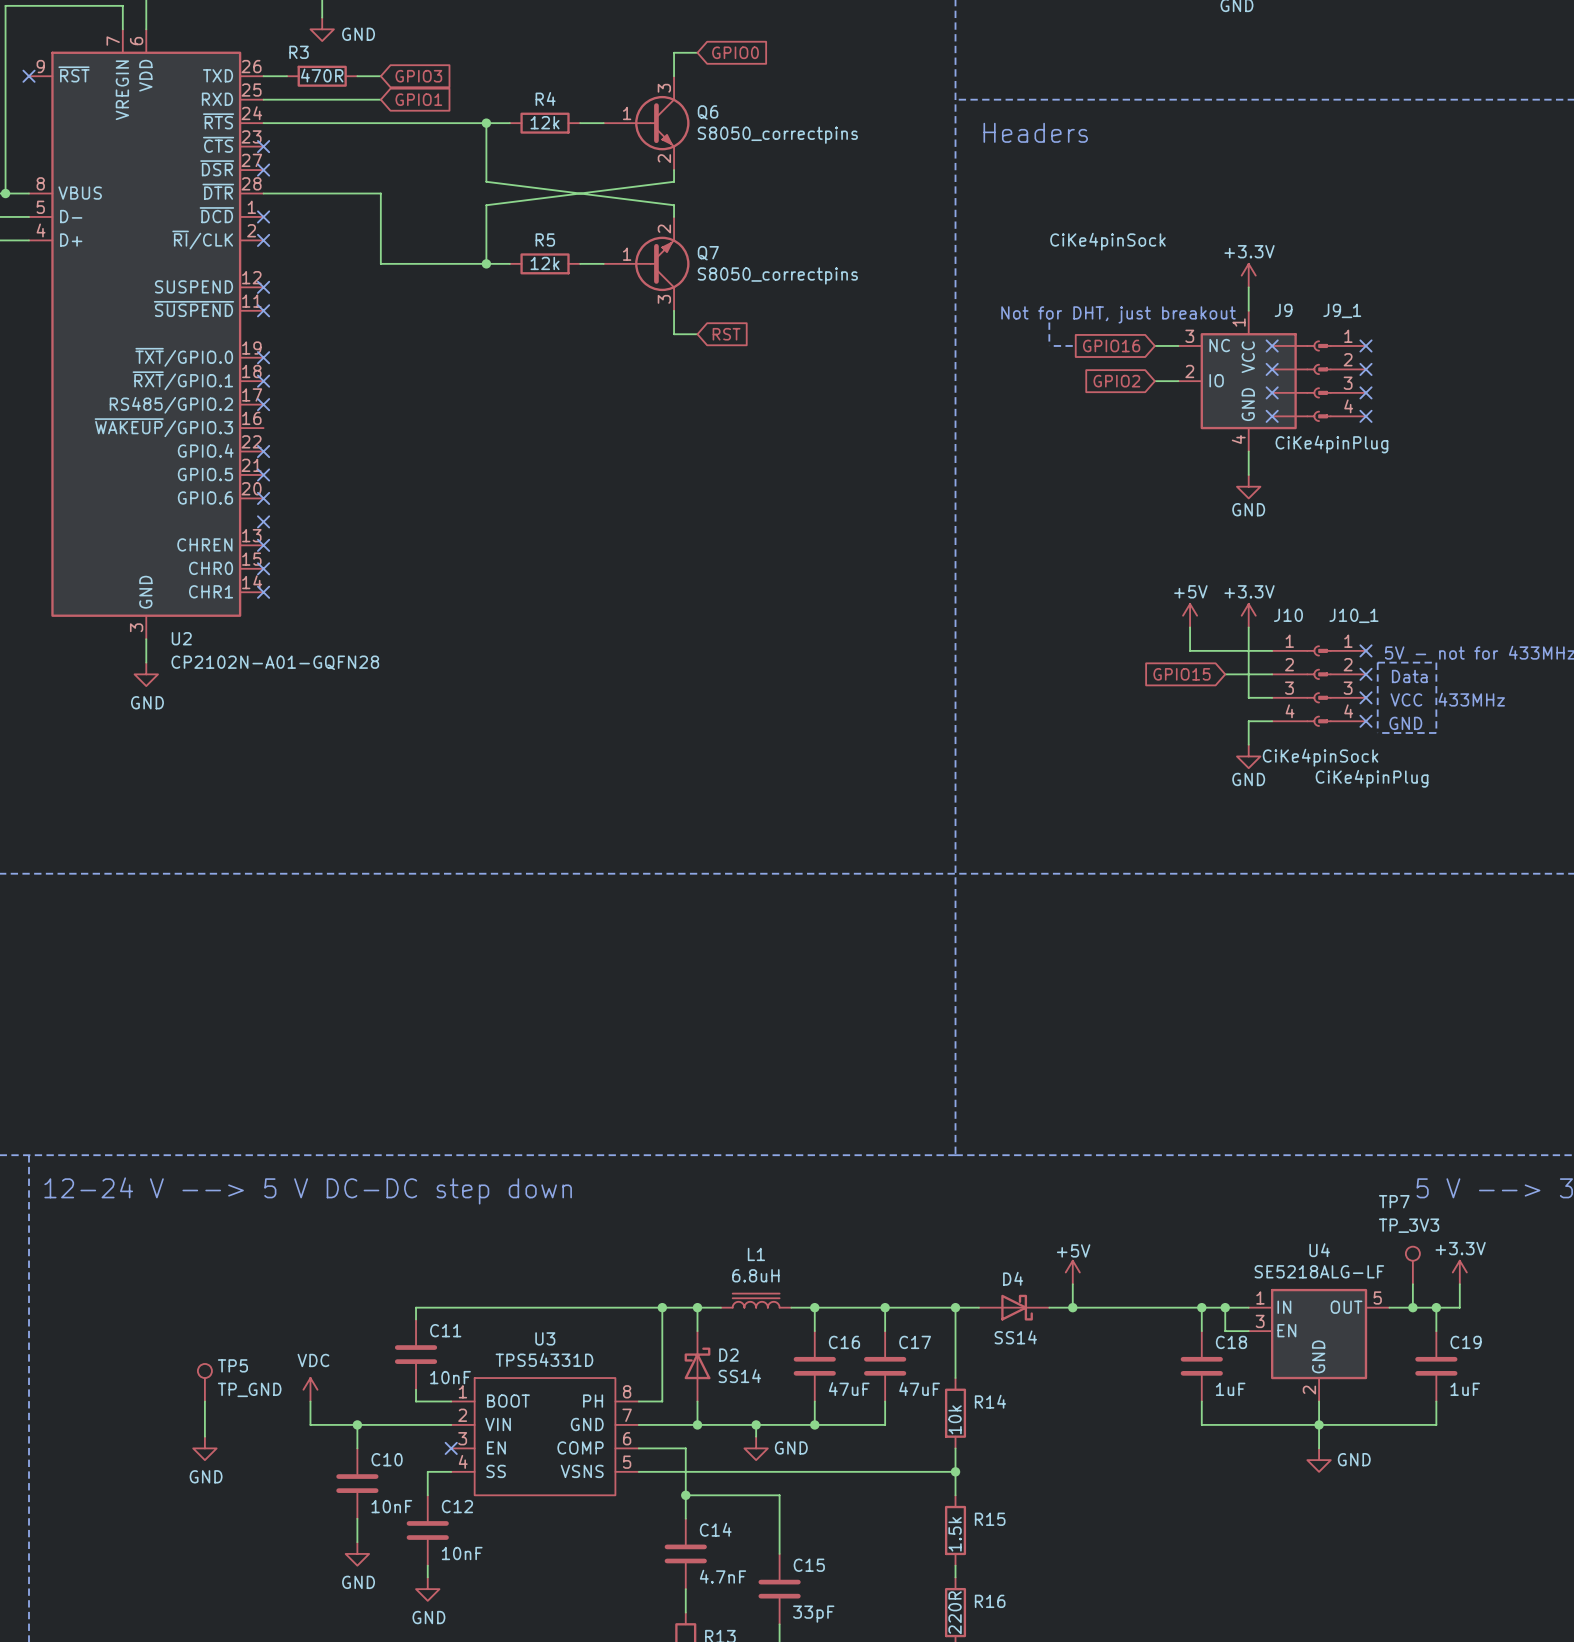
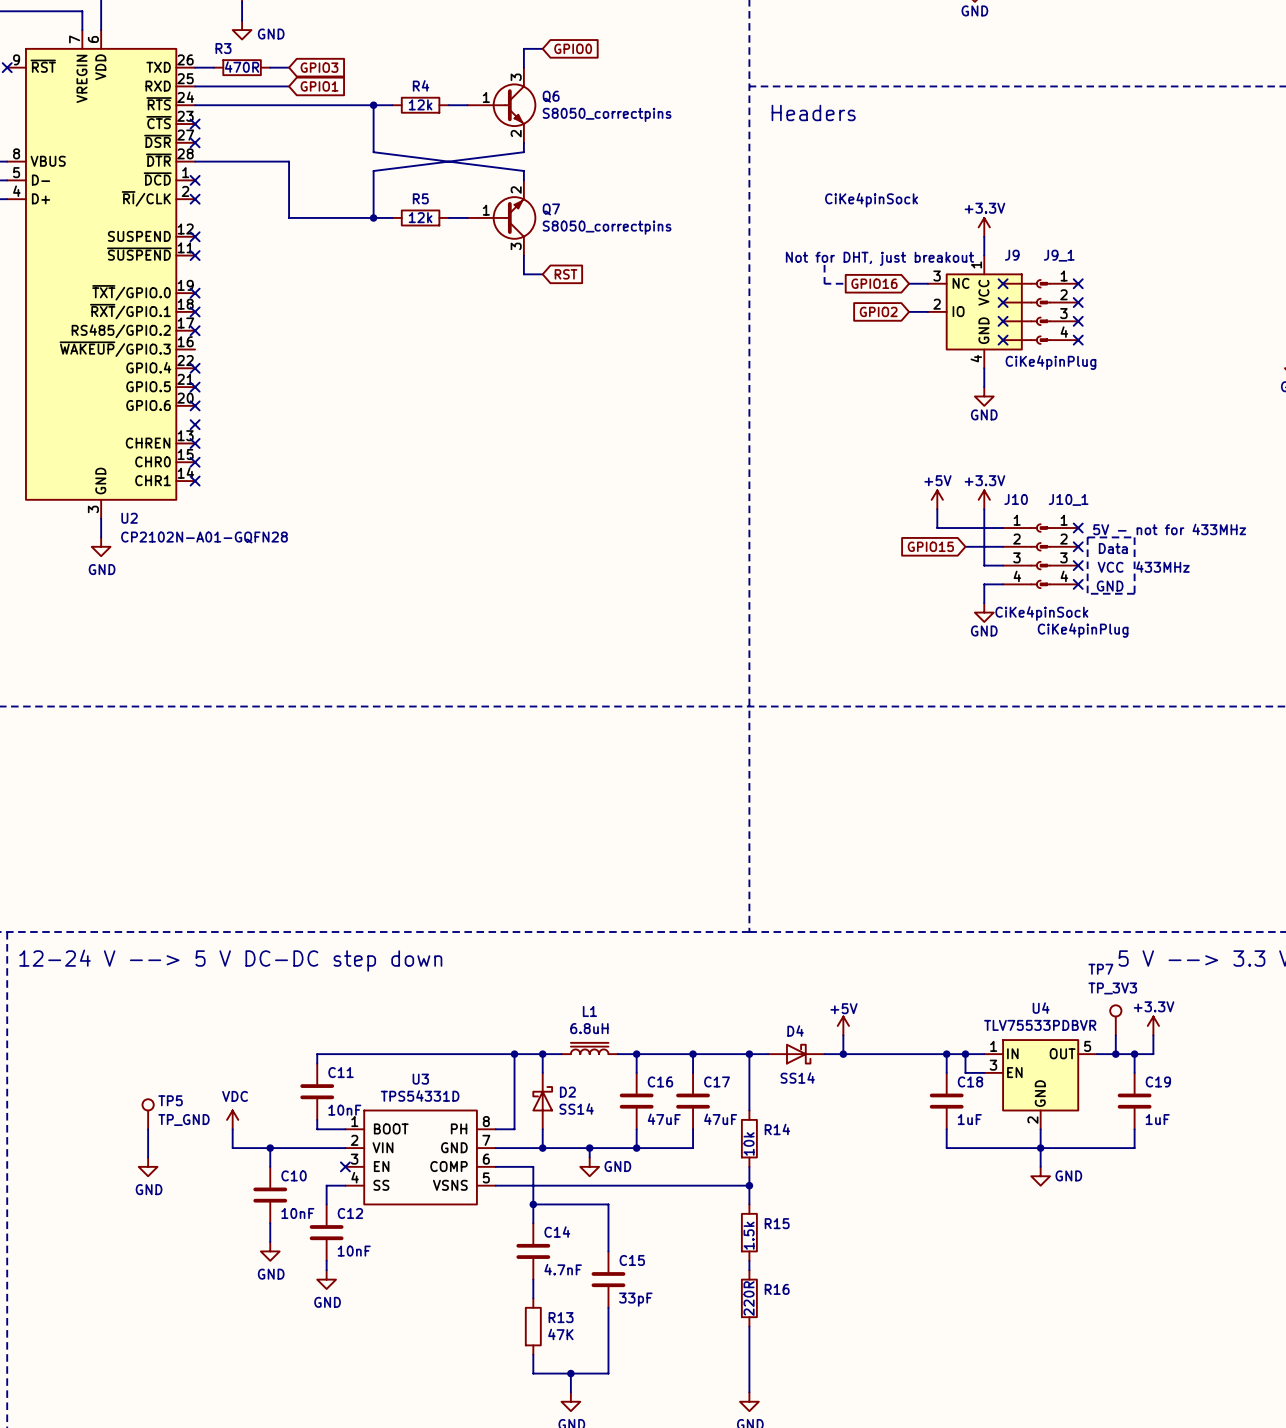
U4 value: SE5218ALG-LF (1319, 1271) -> TLV75533PDBVR (1040, 1025)

